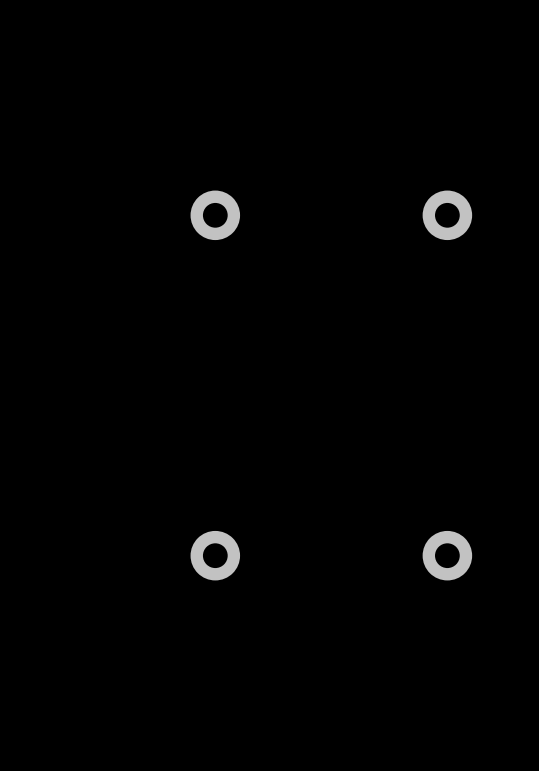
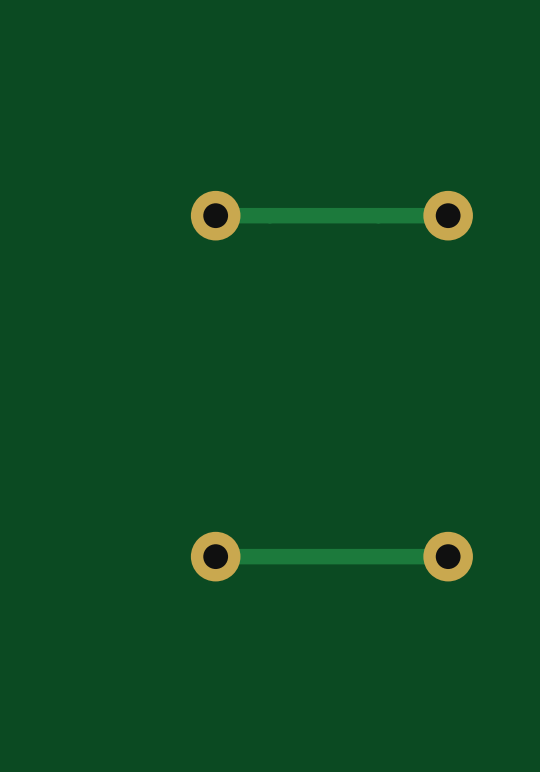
track: none -> (448, 215) (215, 215)
track: none -> (448, 556) (215, 556)

